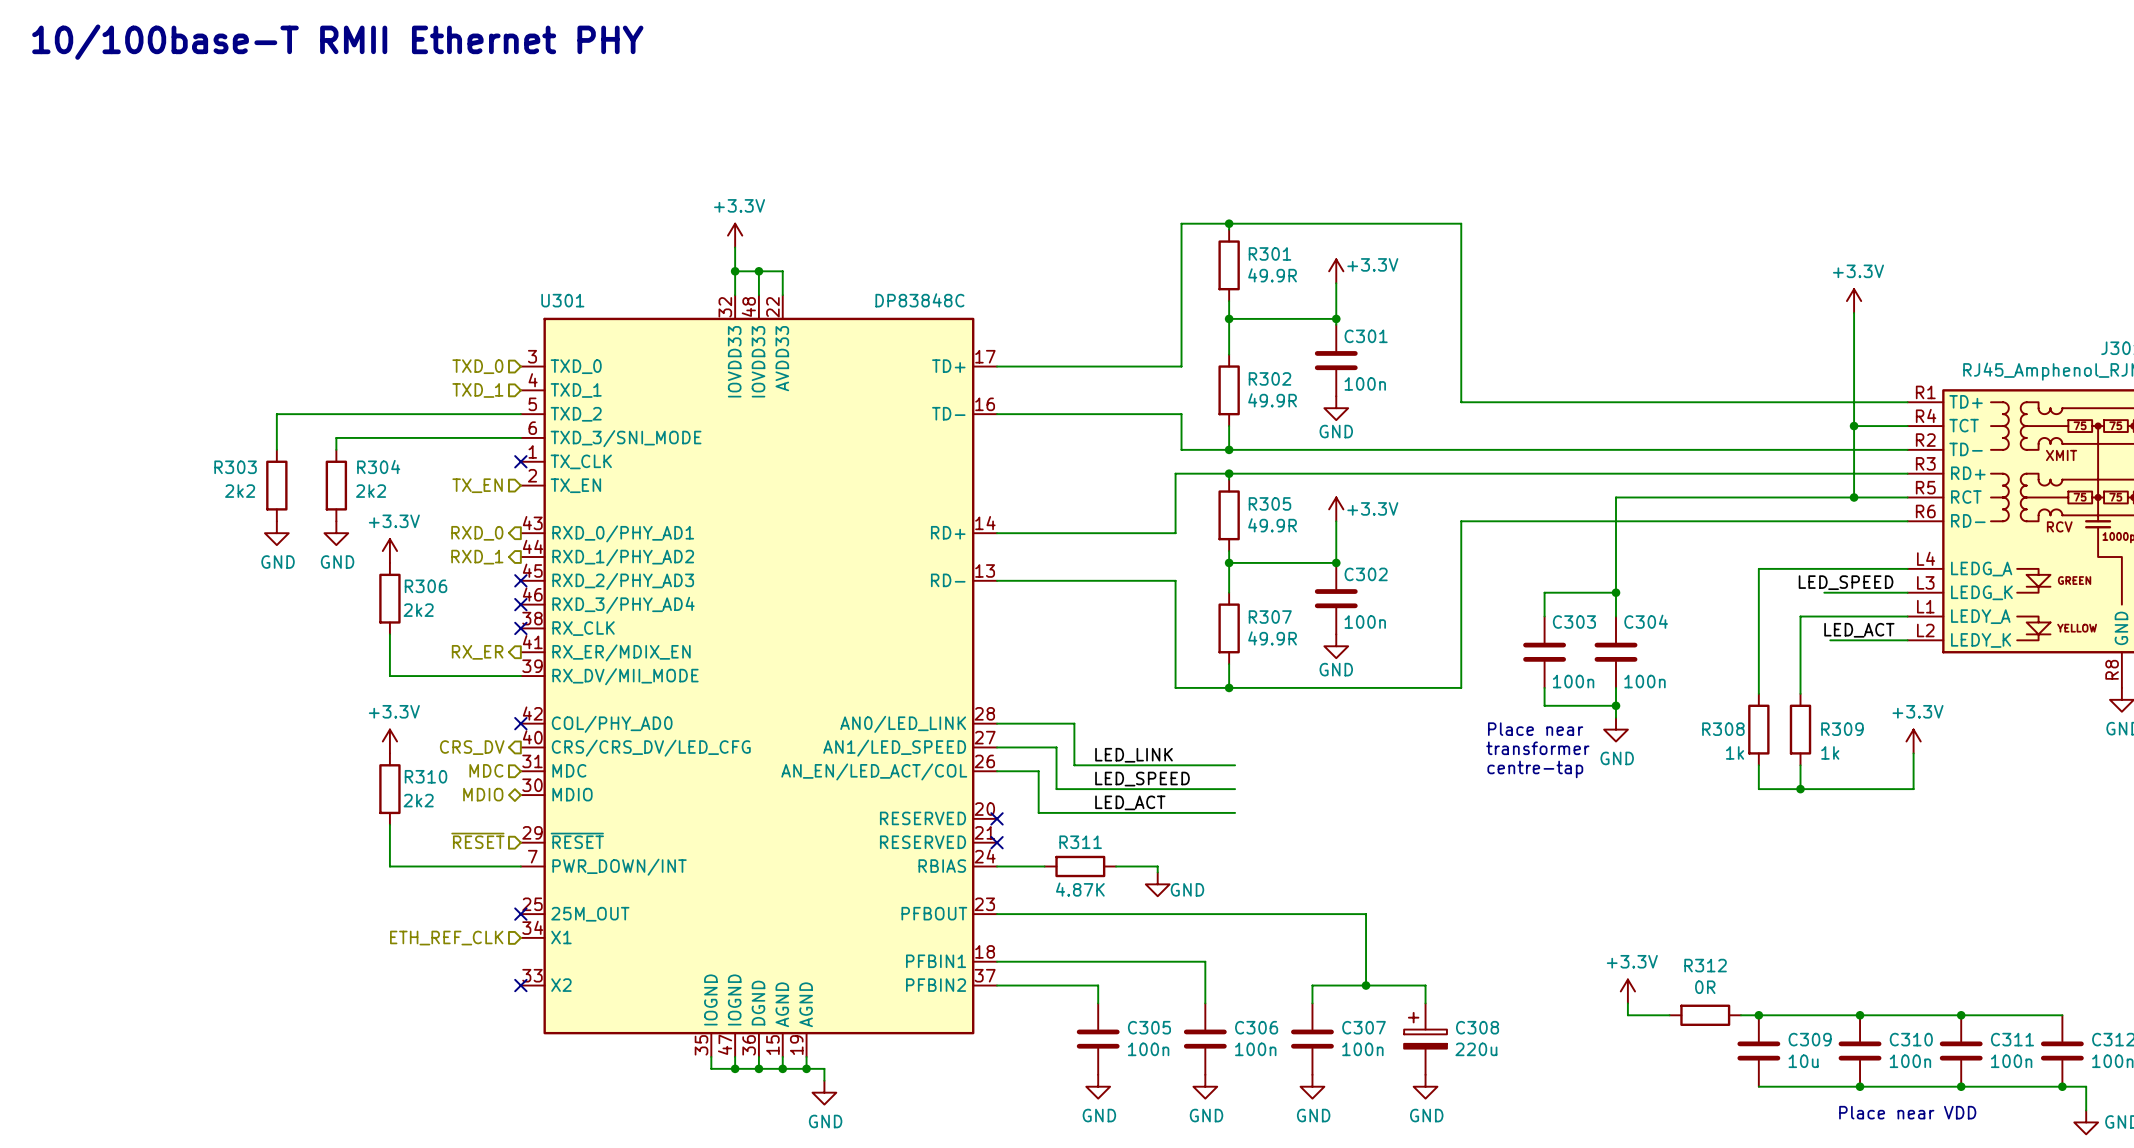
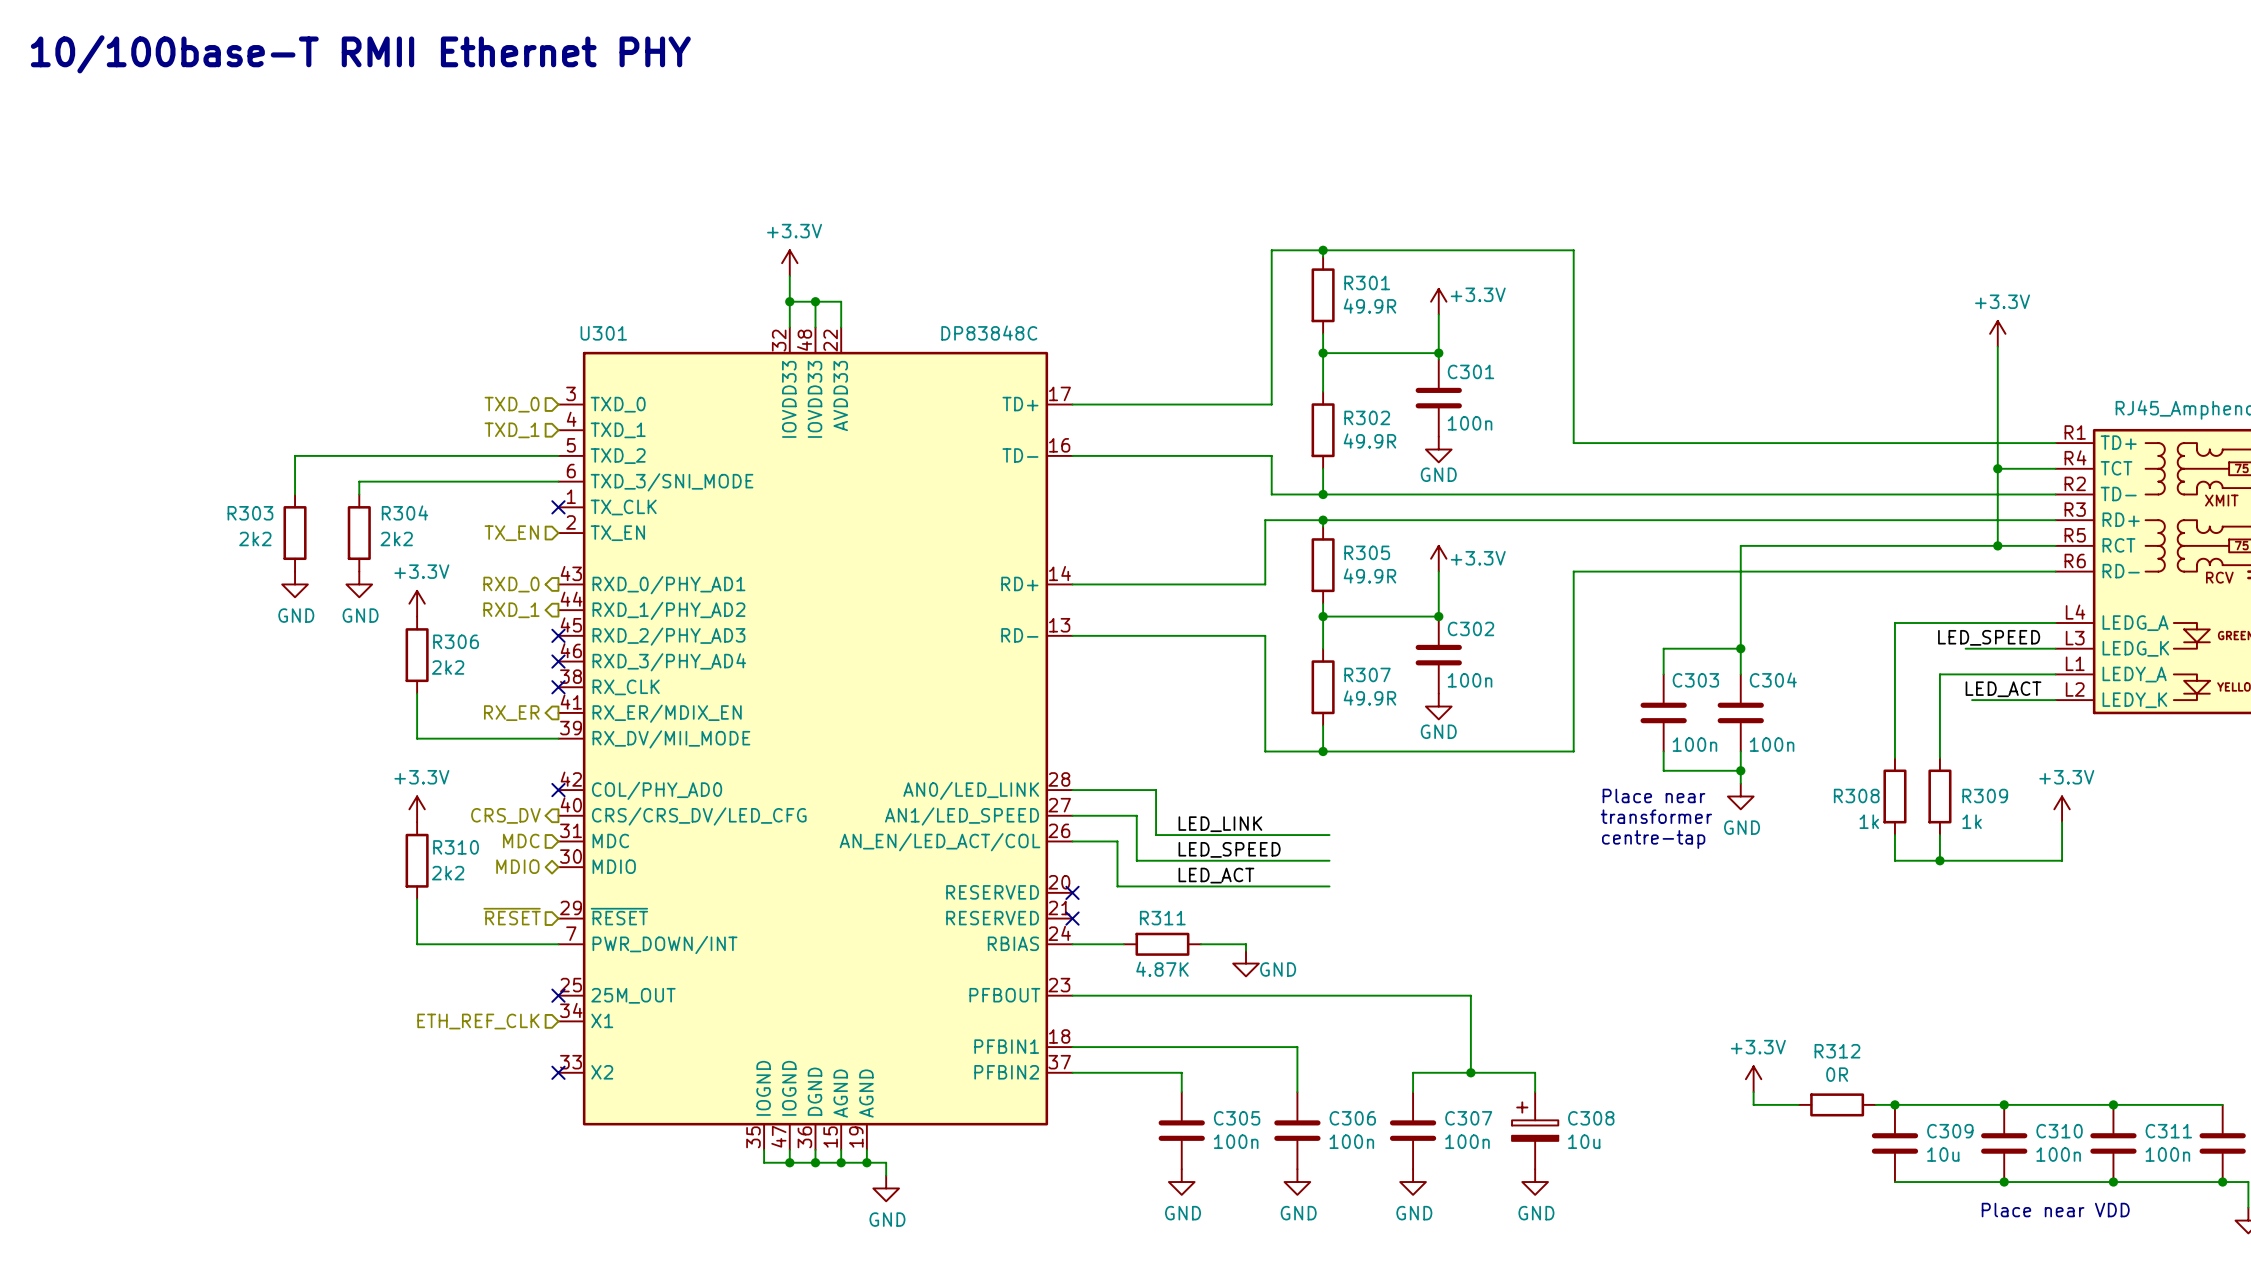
C308 value: 220u (1476, 1049) -> 10u (1584, 1141)

